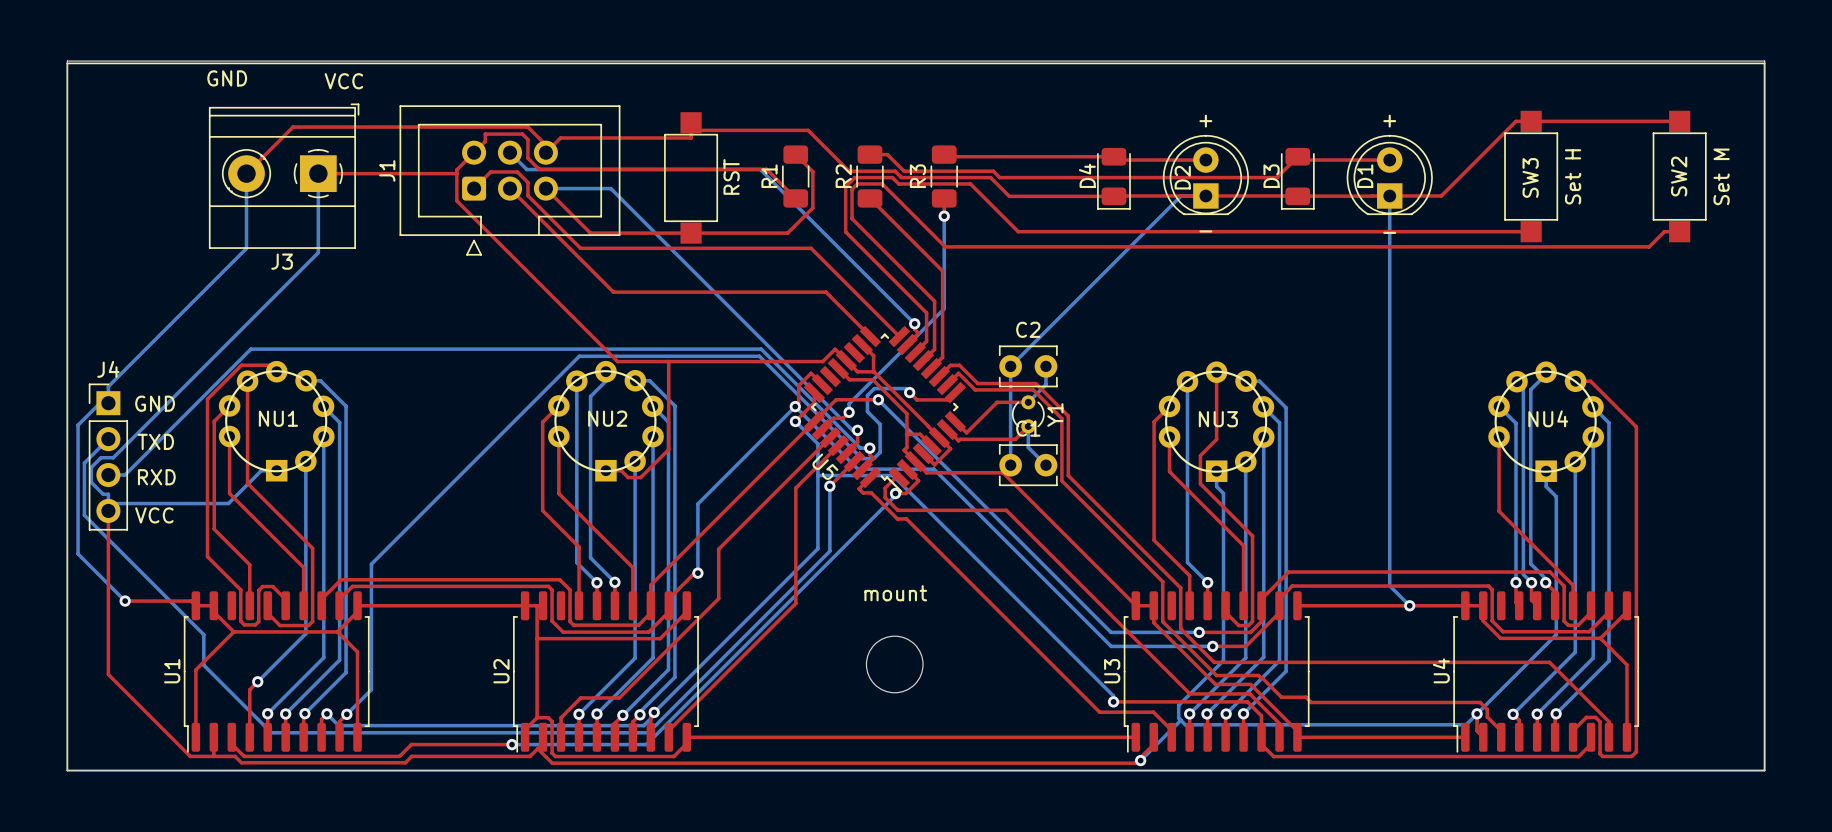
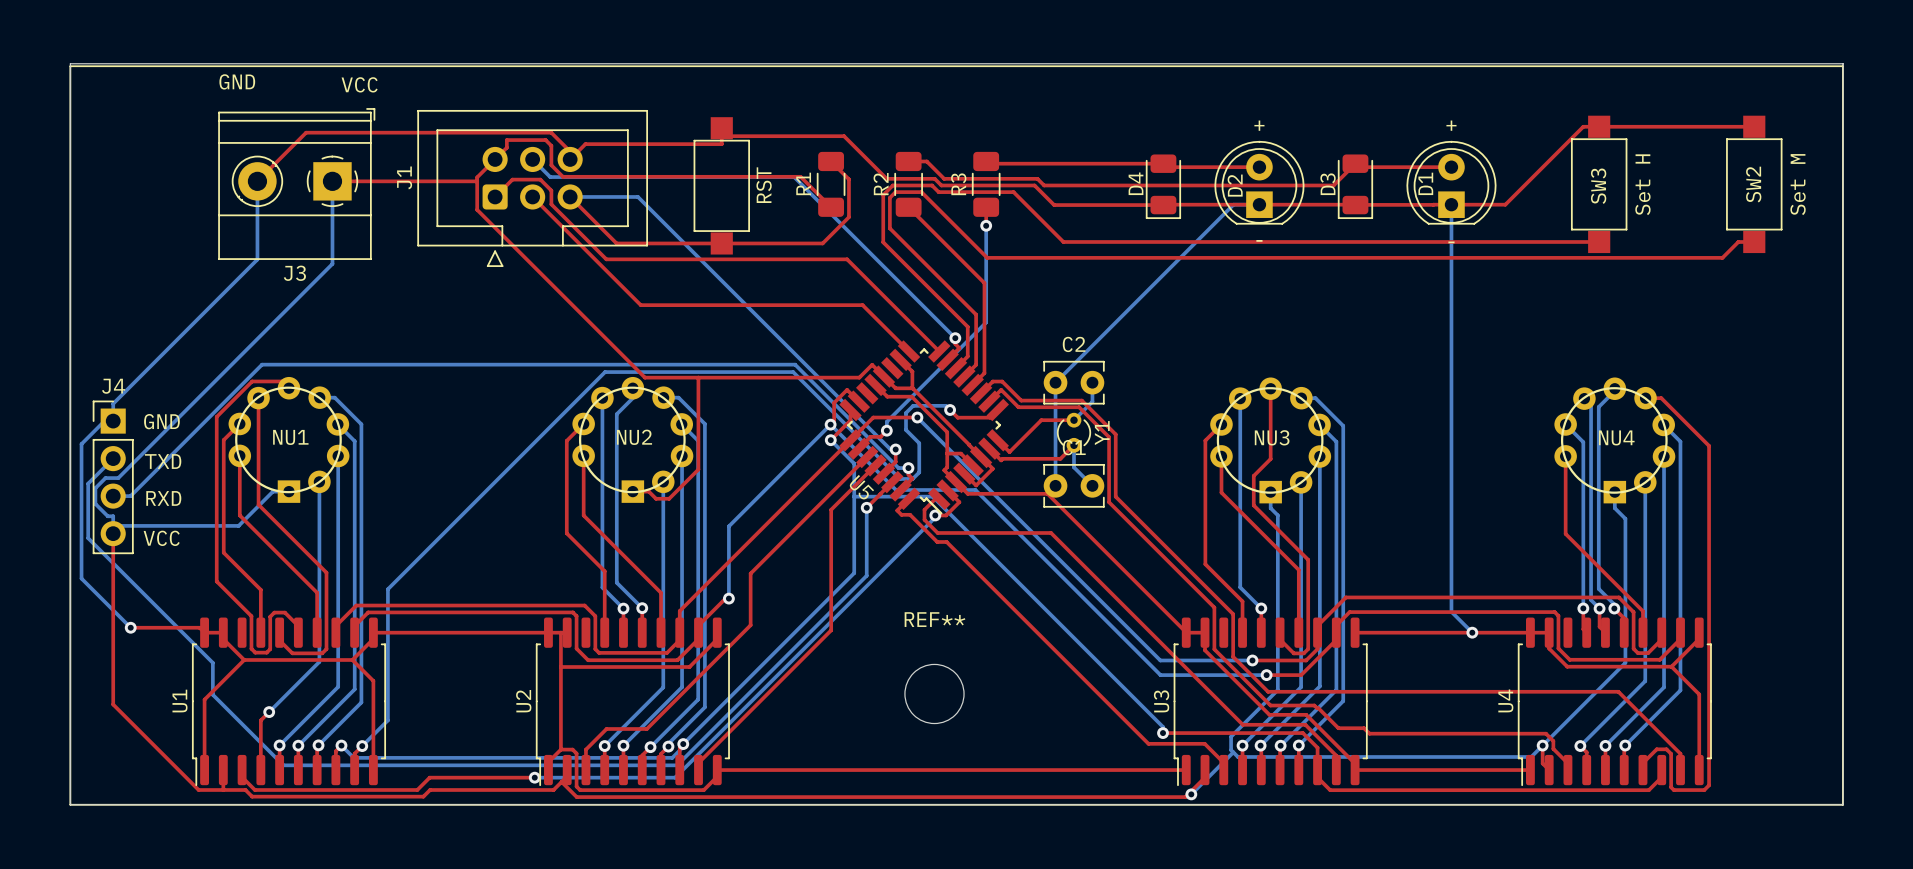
mount name: mount (895, 593) -> REF** (934, 619)

